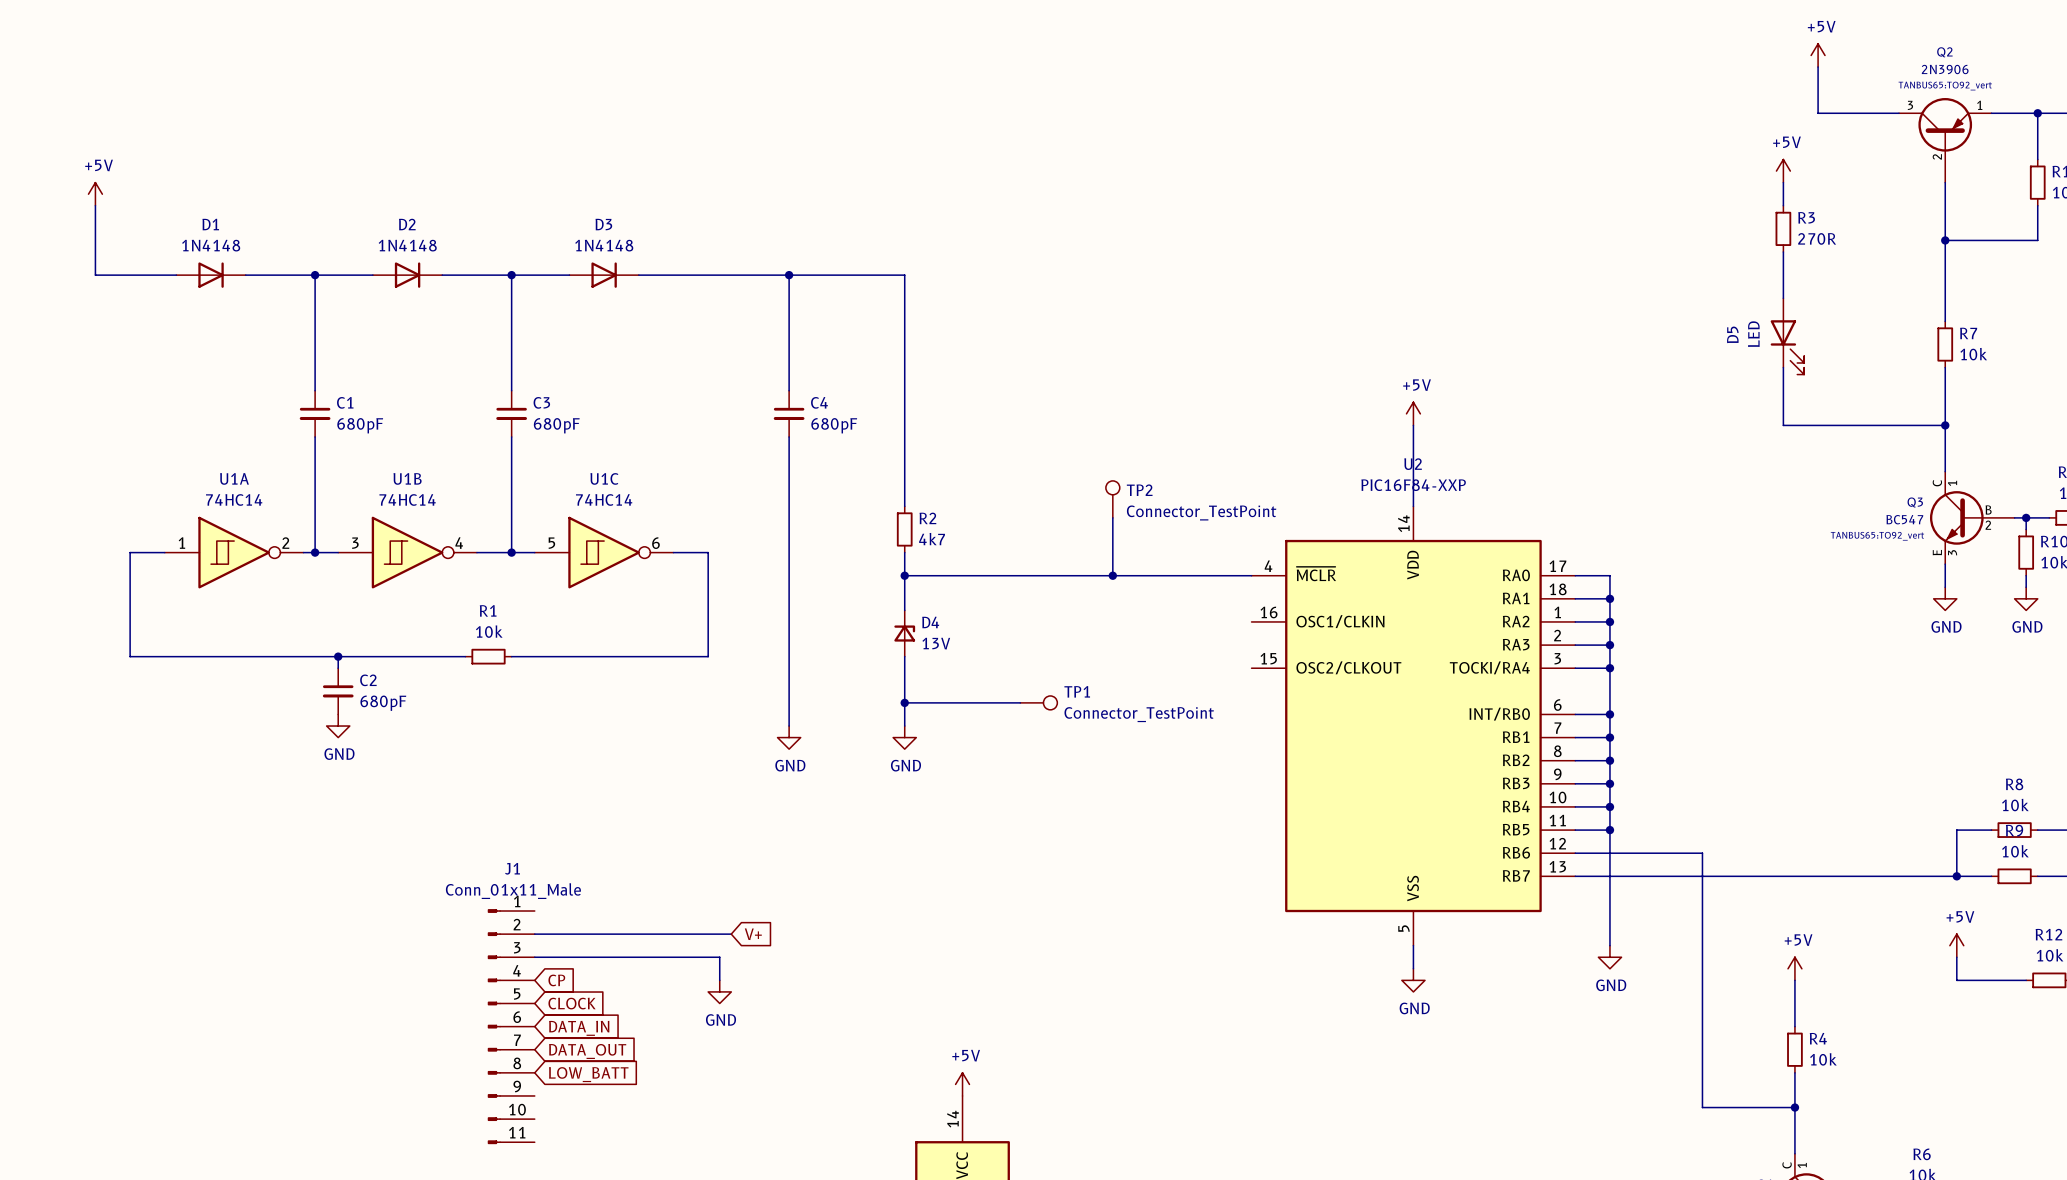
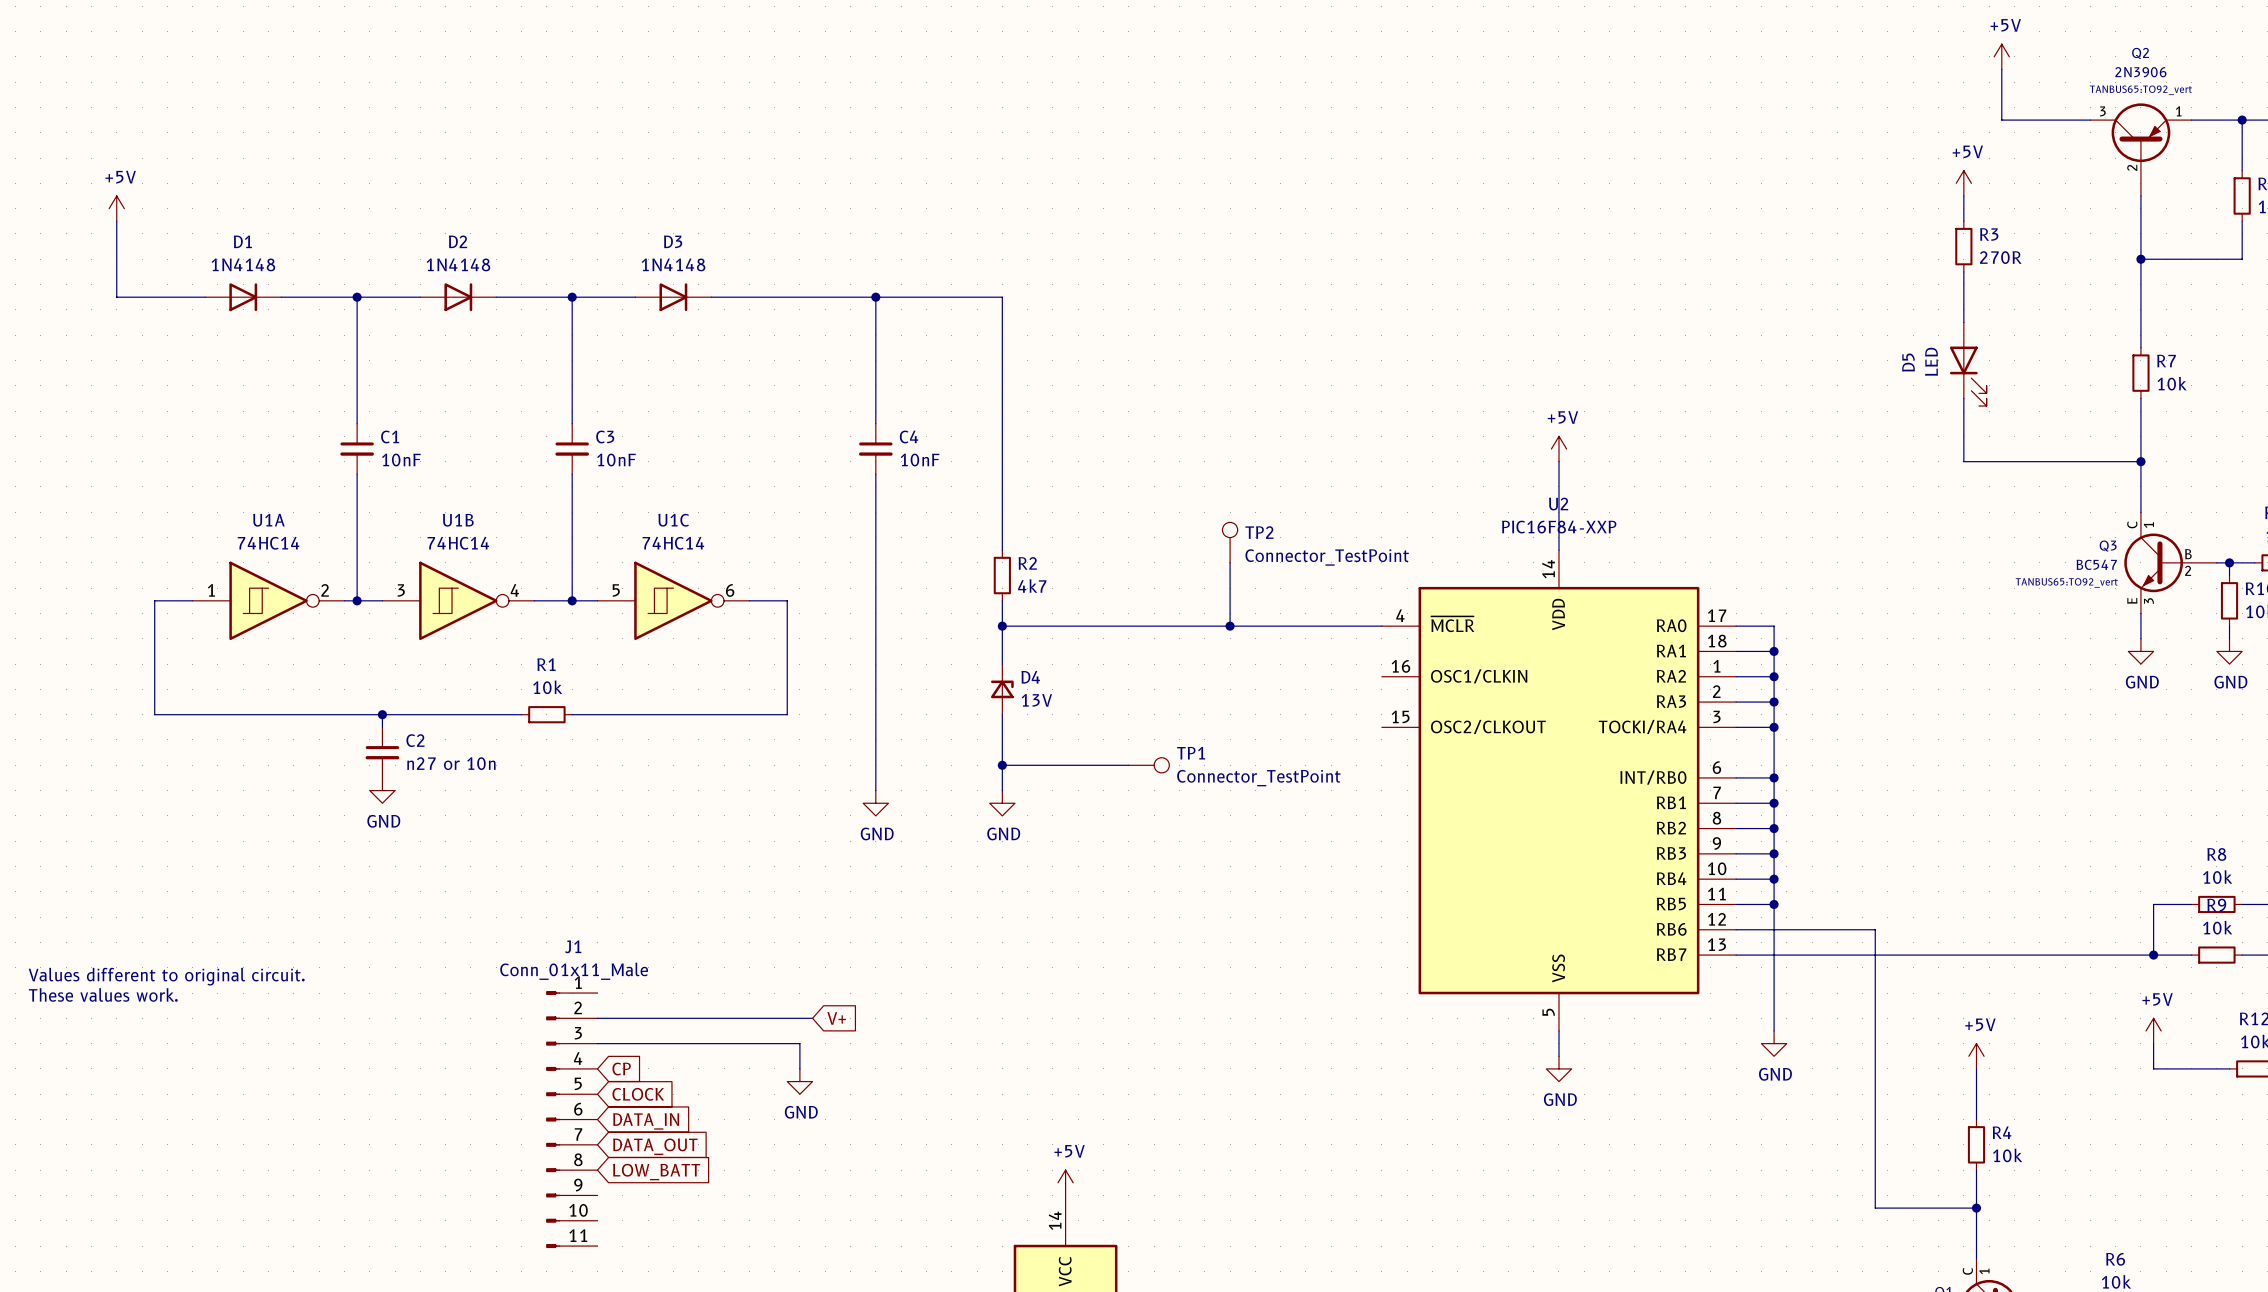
C1 value: 680pF (360, 425) -> 10nF (401, 460)
C3 value: 680pF (556, 425) -> 10nF (616, 460)
C4 value: 680pF (834, 425) -> 10nF (920, 460)
C2 value: 680pF (383, 703) -> n27 or 10n (451, 763)
text: none -> Values different to original circuit. (166, 976)
text: none -> These values work. (103, 994)

